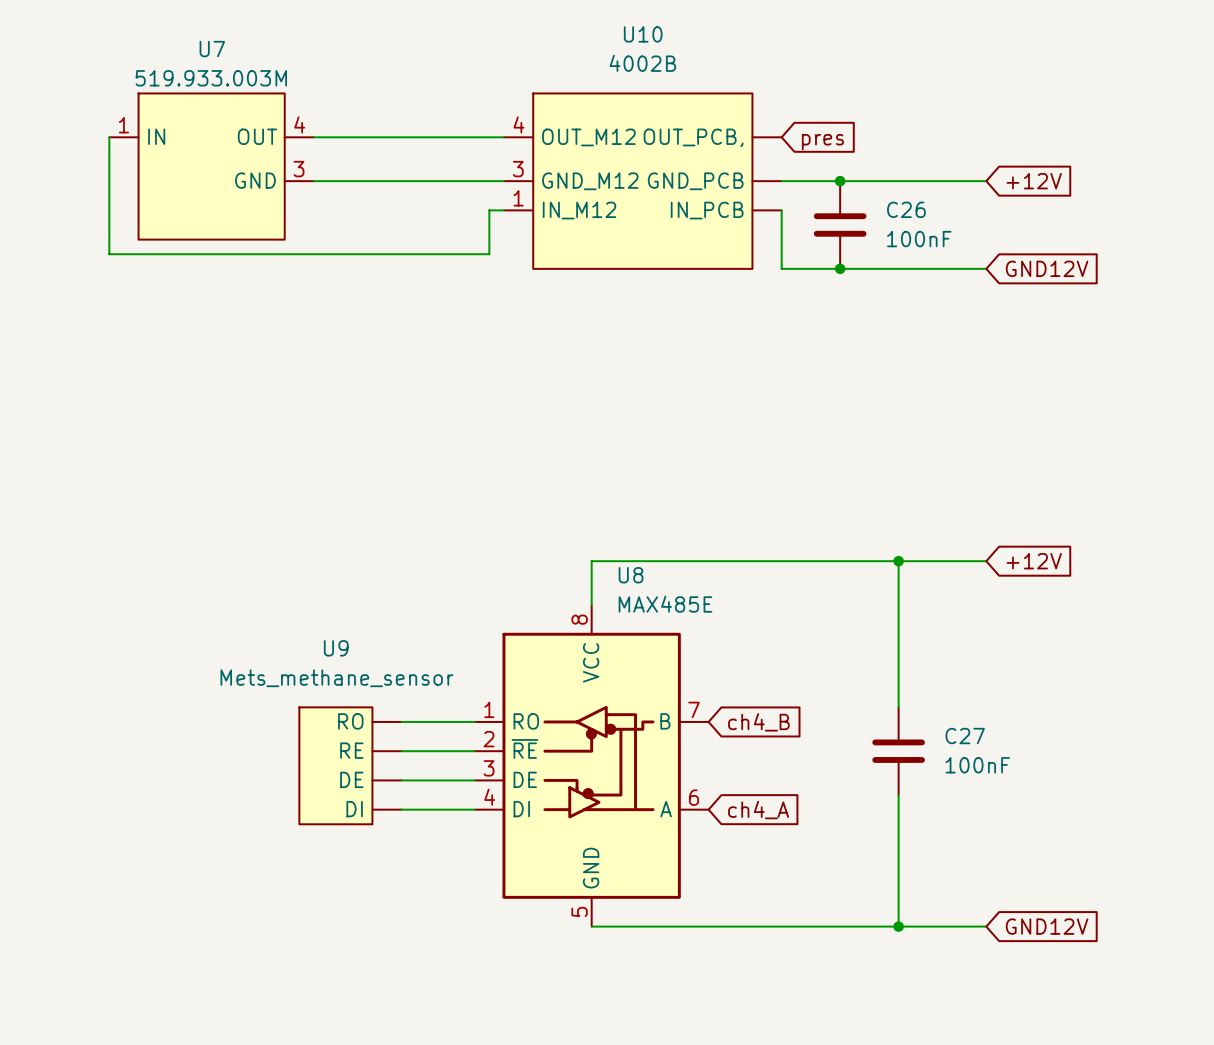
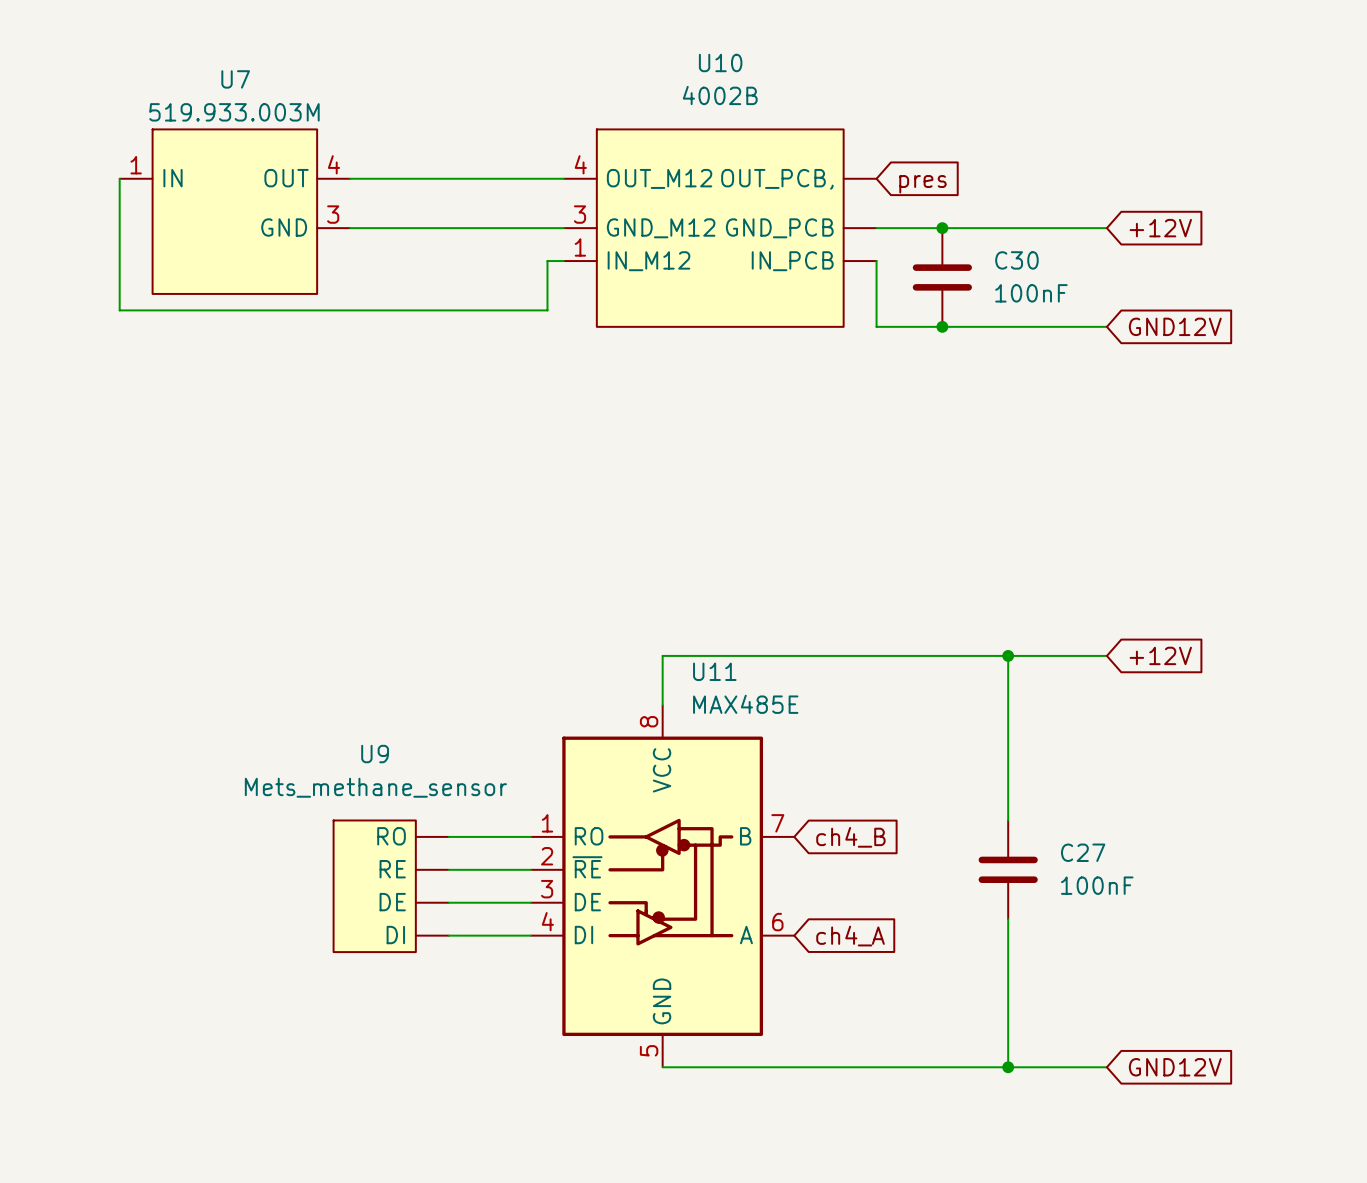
C26 name: C26 (906, 209) -> C30 (1016, 260)
U8 name: U8 (631, 575) -> U11 (714, 671)

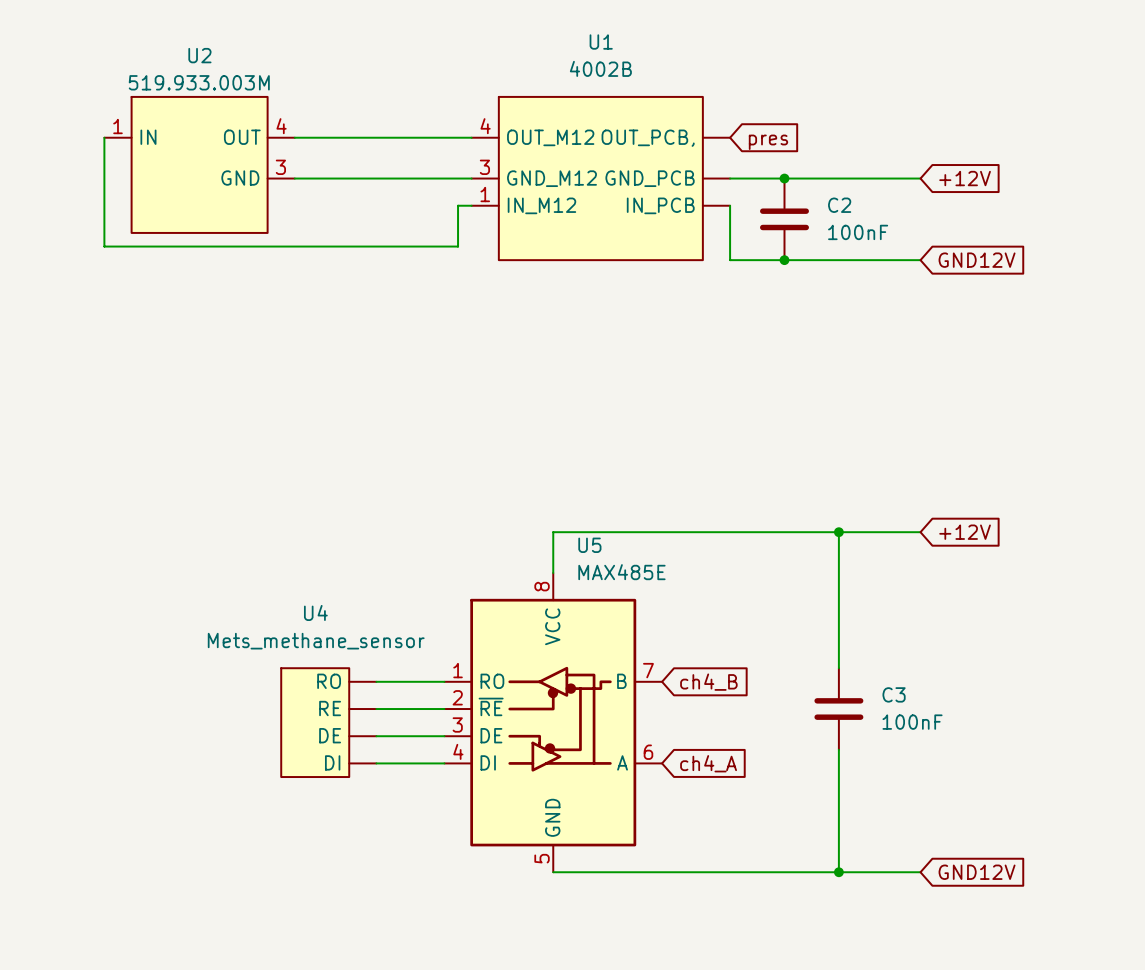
U10 name: U10 (720, 62) -> U1 (601, 42)
U7 name: U7 (235, 79) -> U2 (199, 55)
C30 name: C30 (1016, 260) -> C2 (839, 205)
U11 name: U11 (714, 671) -> U5 (589, 545)
U9 name: U9 (375, 754) -> U4 (315, 612)
C27 name: C27 (1083, 852) -> C3 (894, 694)

